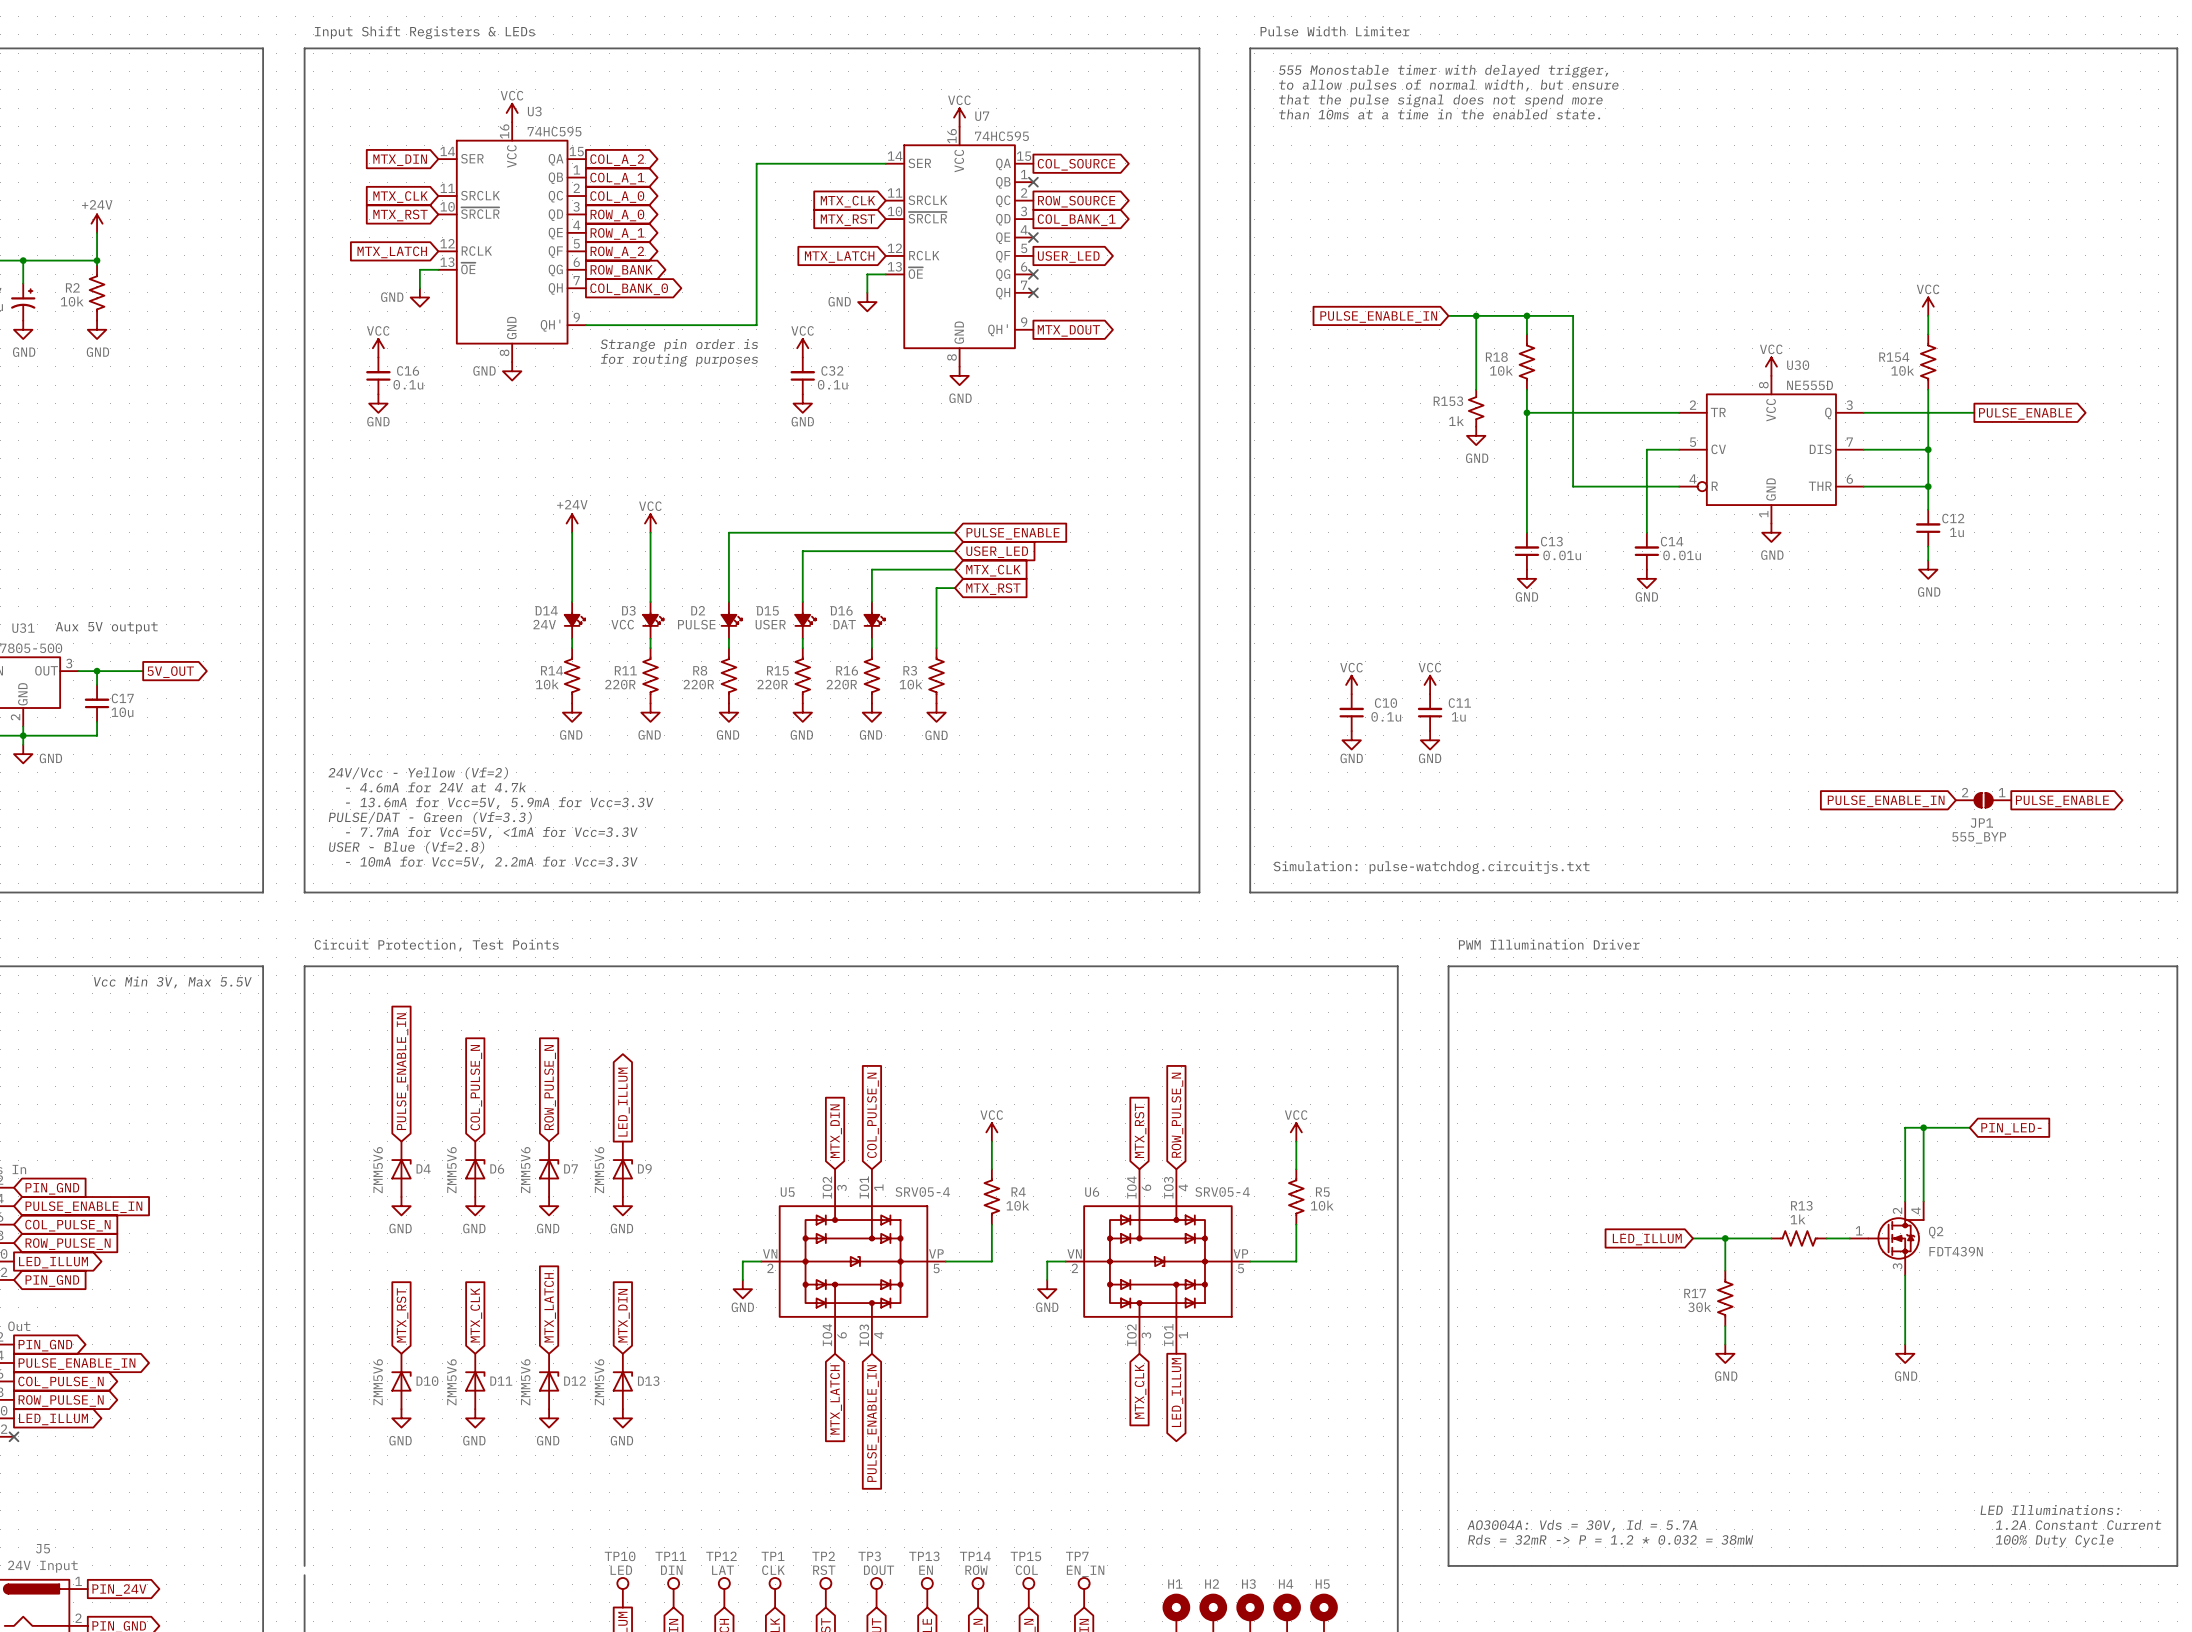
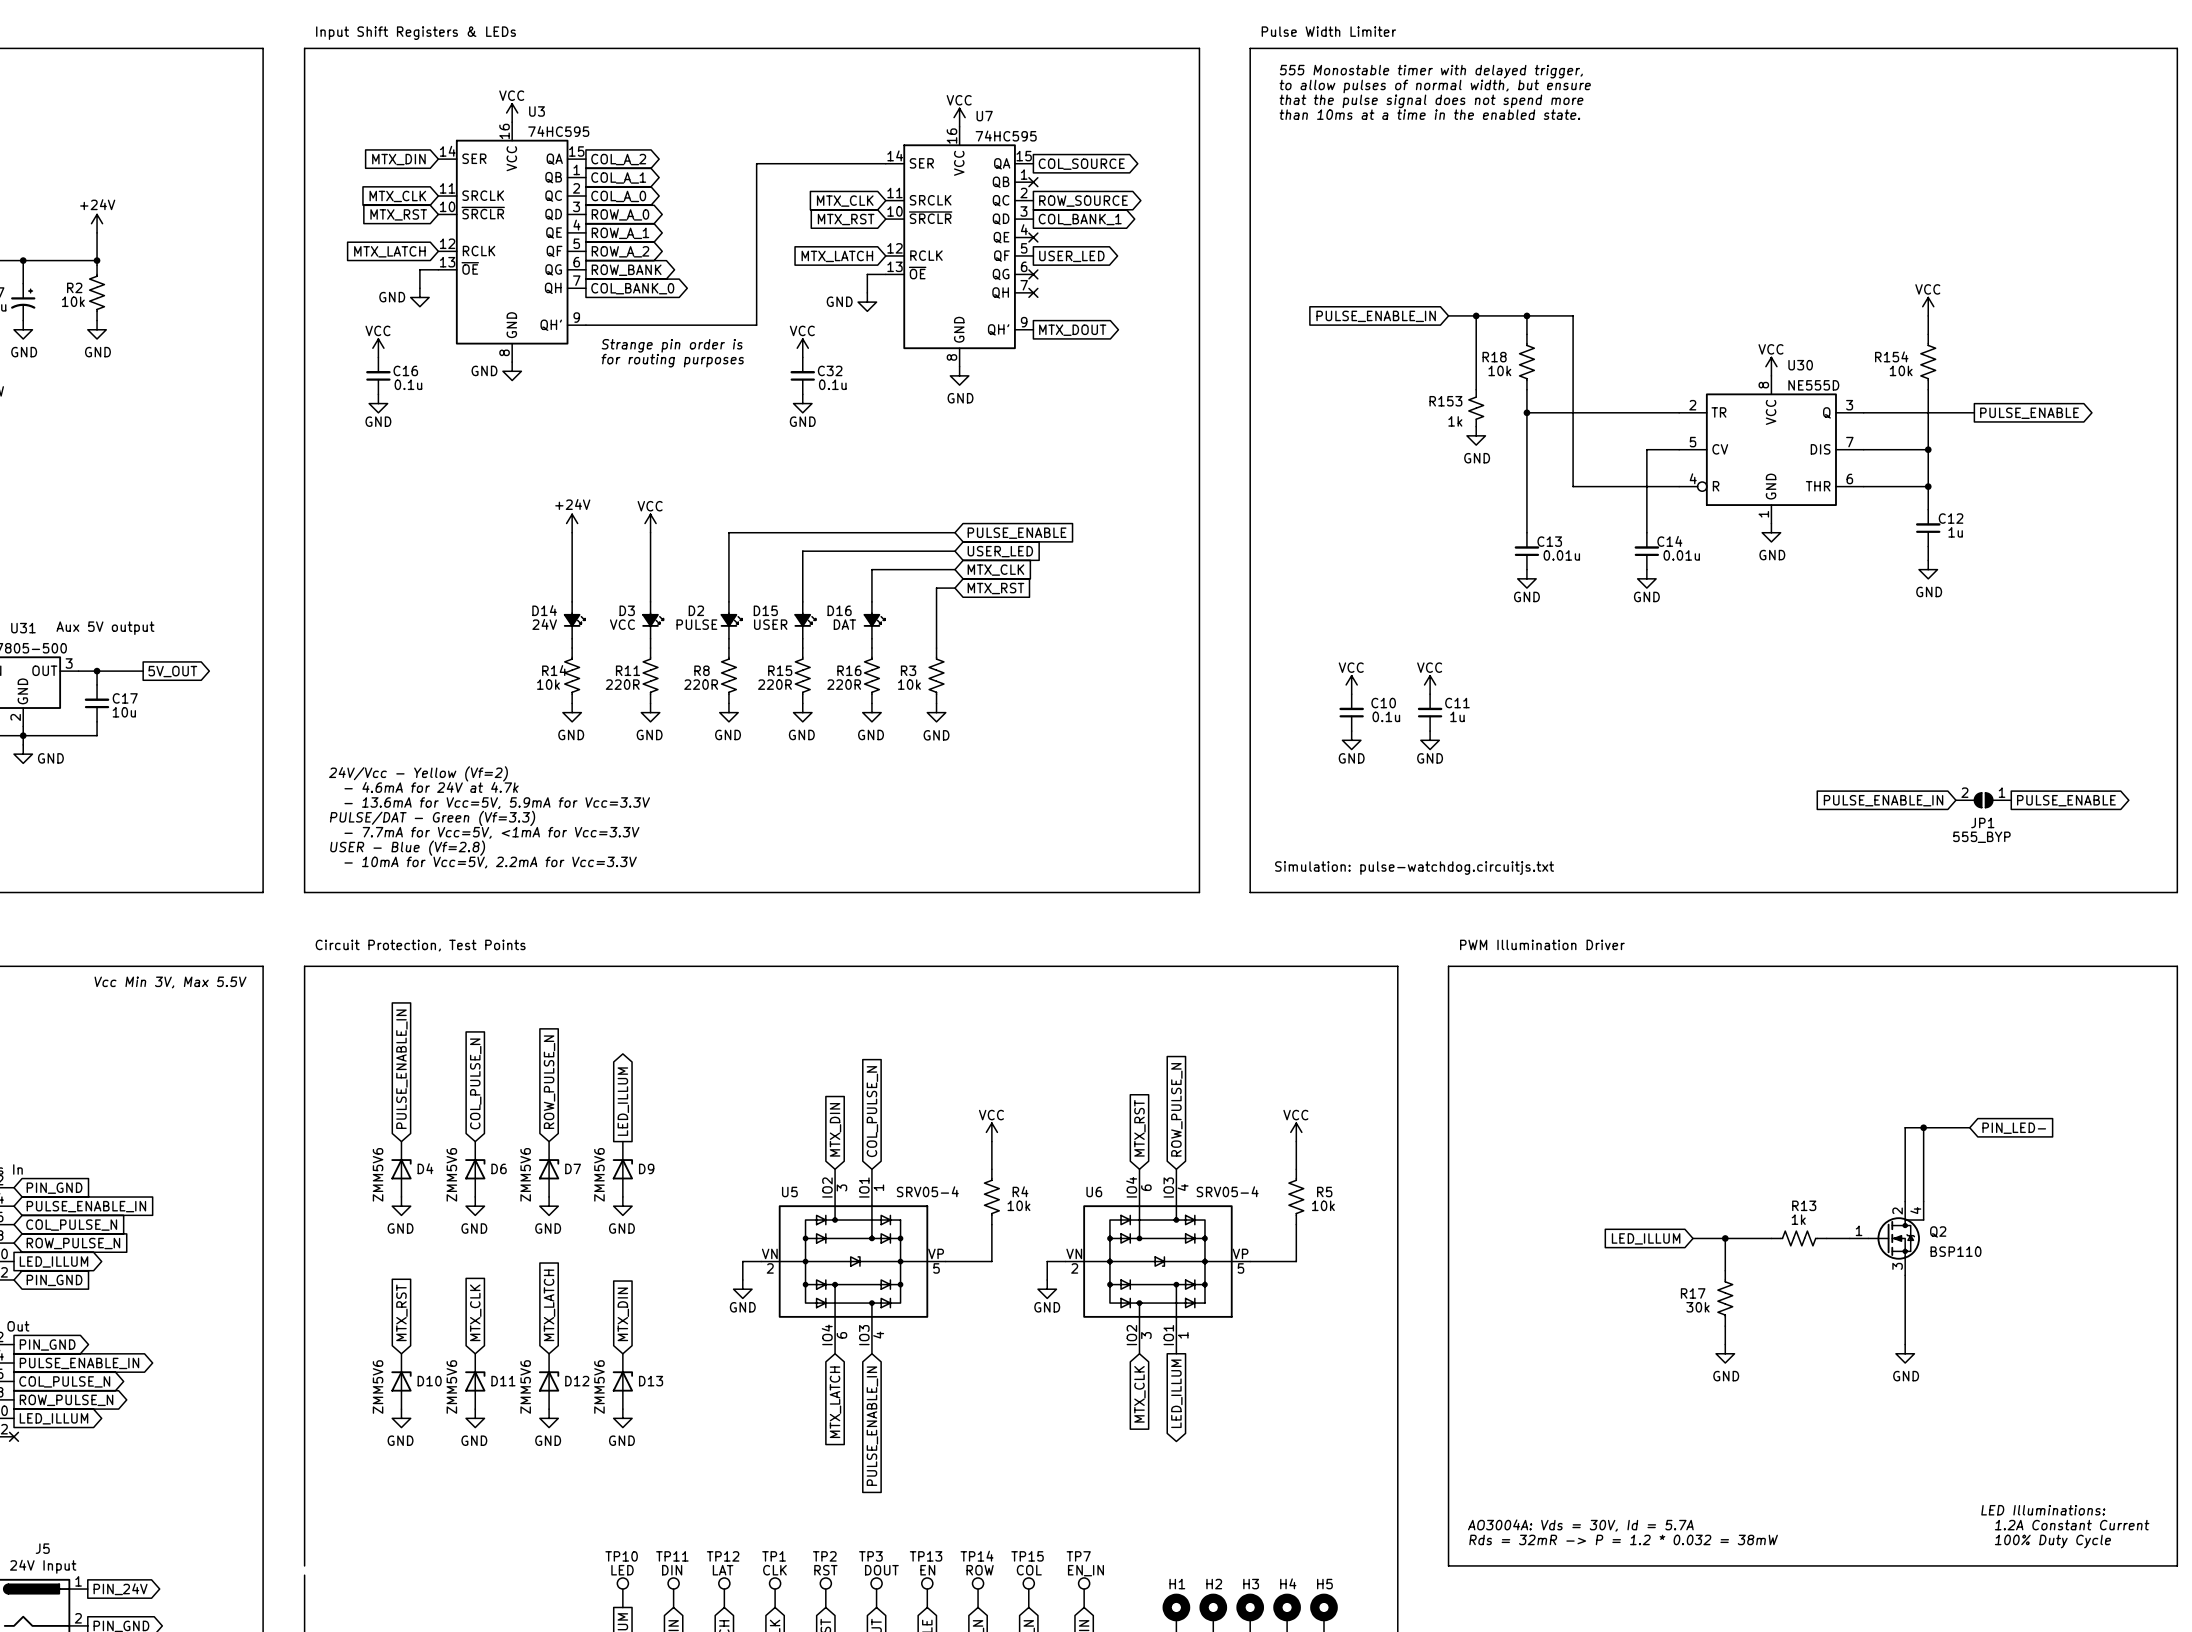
Q2 value: FDT439N (1956, 1251) -> BSP110 (1955, 1251)

